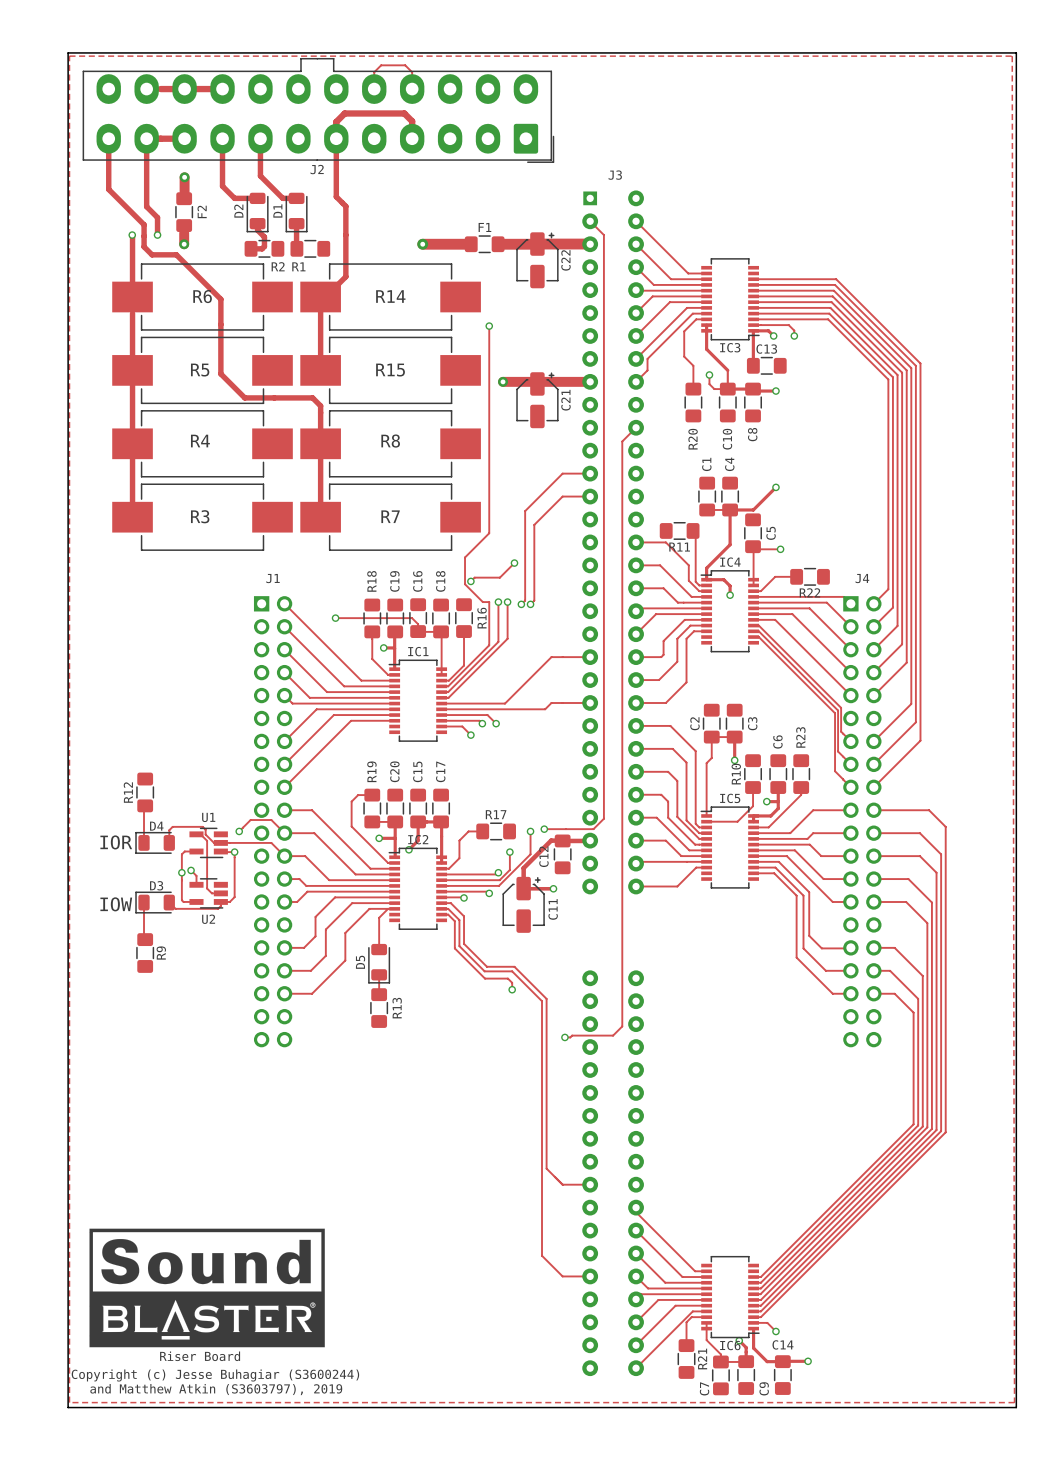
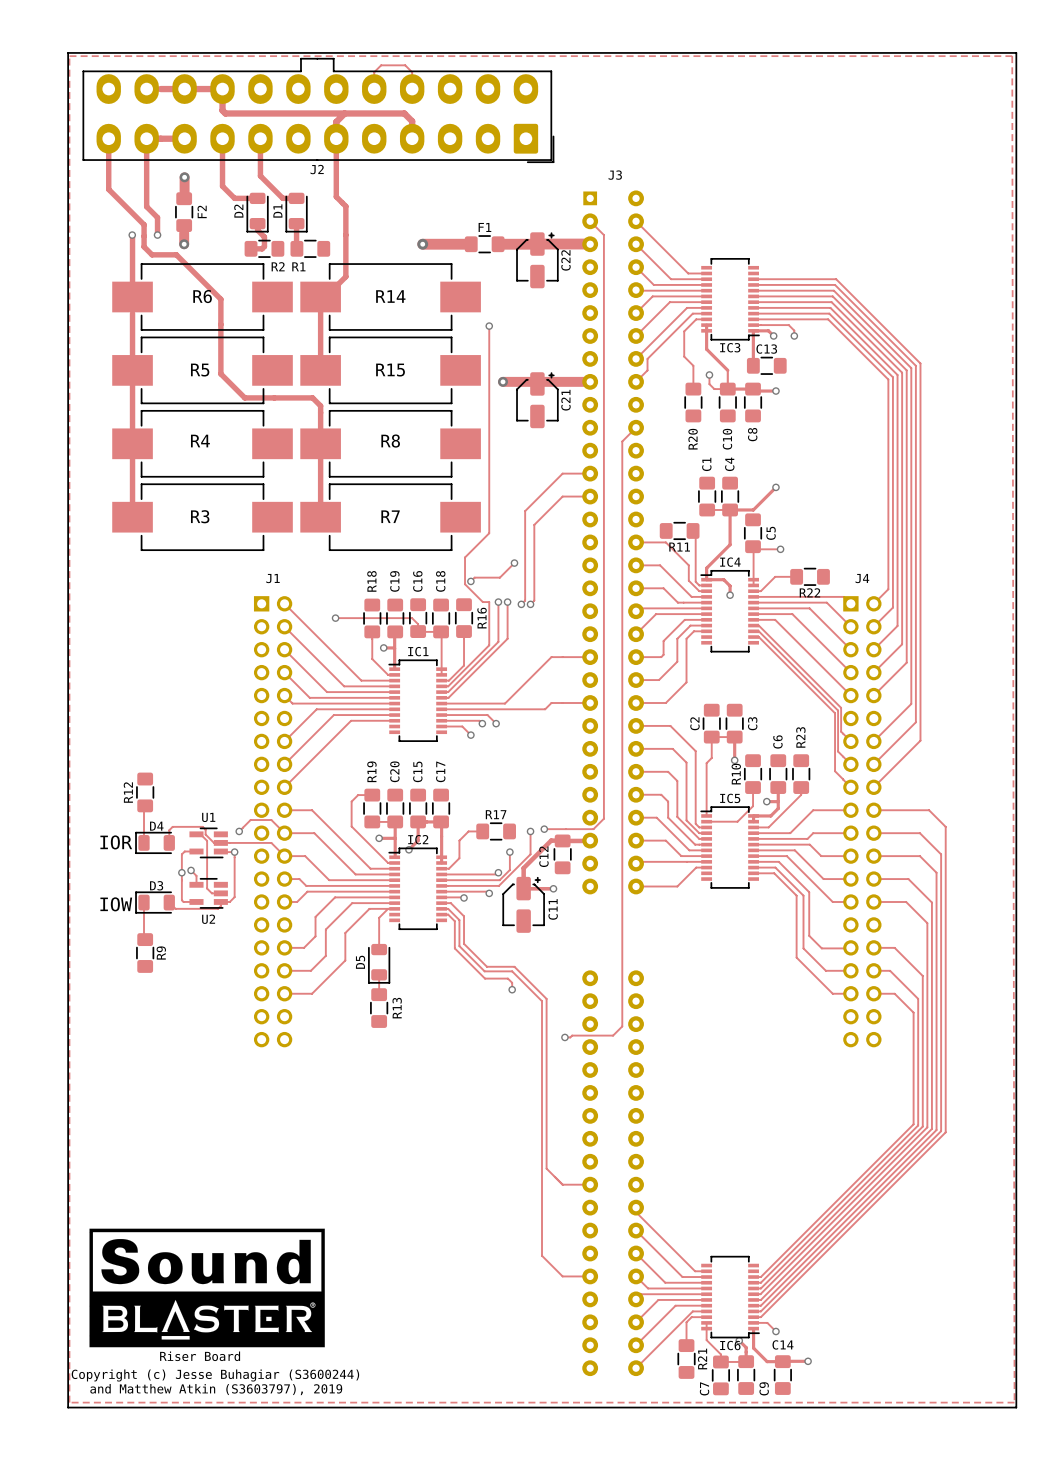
track: none -> (222, 89) (222, 110) (225, 113) (344, 113)

